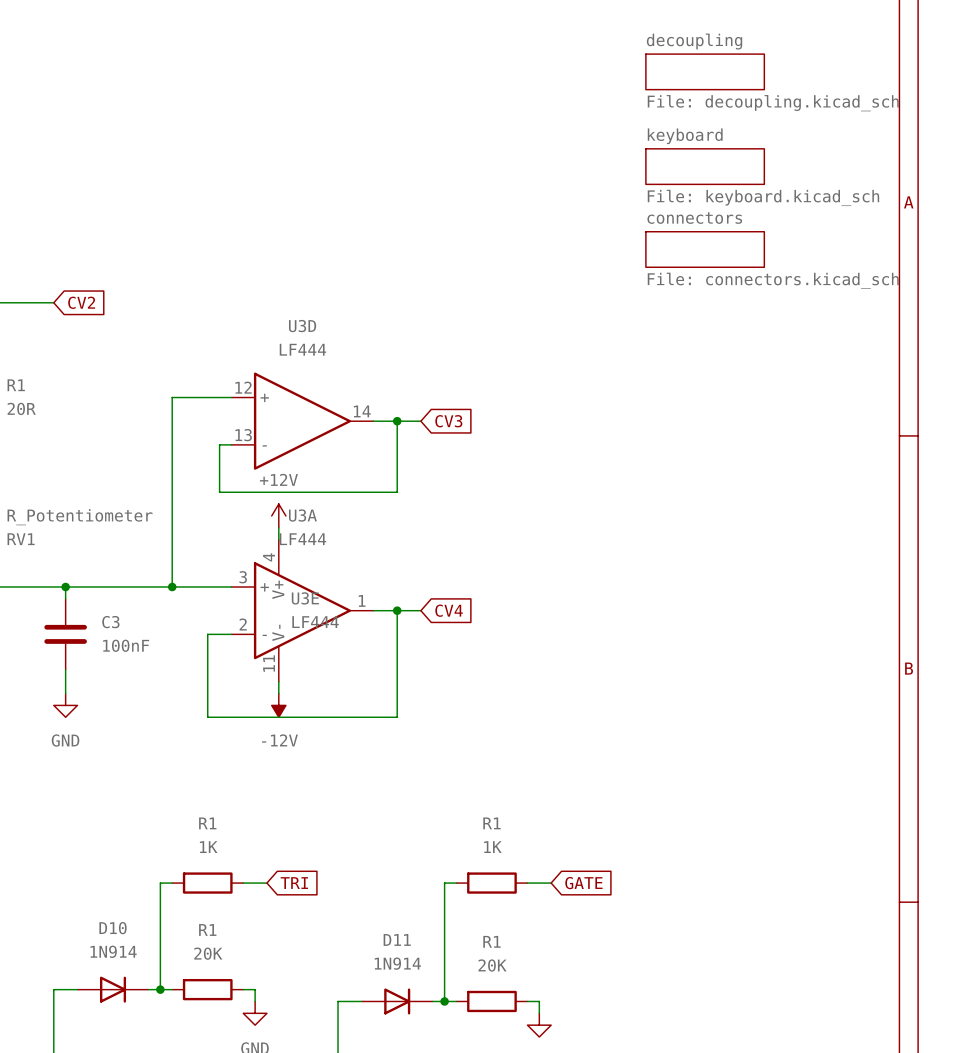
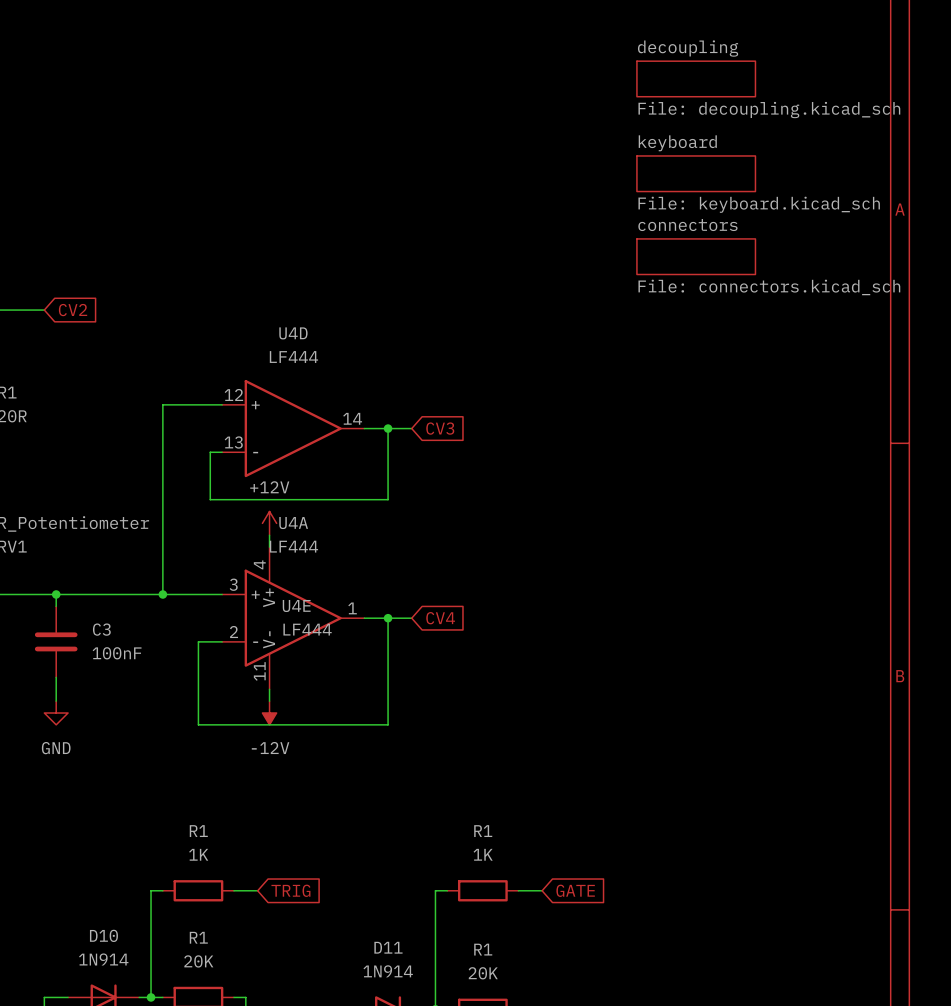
U3D name: U3D (302, 326) -> U4D (293, 333)
U3A name: U3A (302, 515) -> U4A (293, 523)
U3E name: U3E (305, 598) -> U4E (296, 606)
global label: TRI (294, 883) -> TRIG (290, 890)

